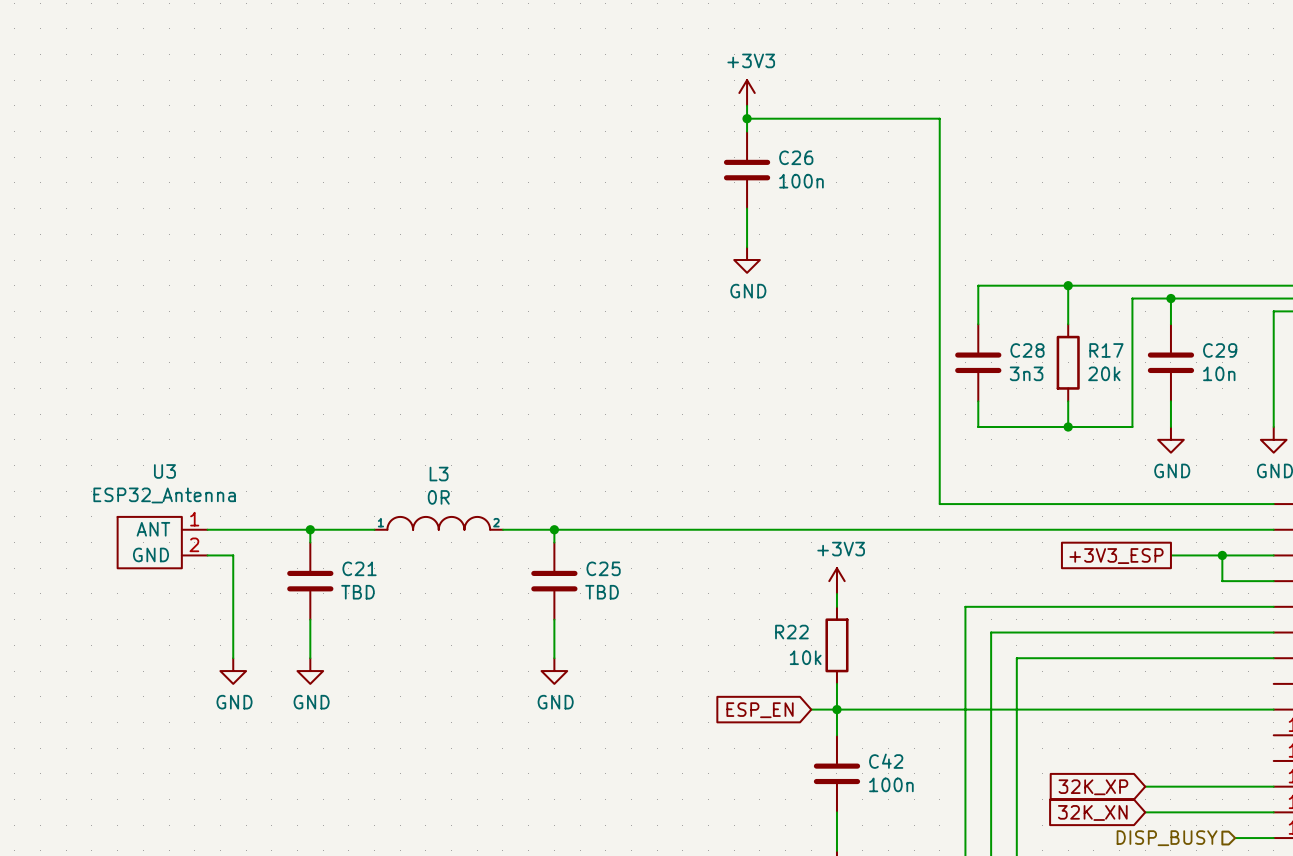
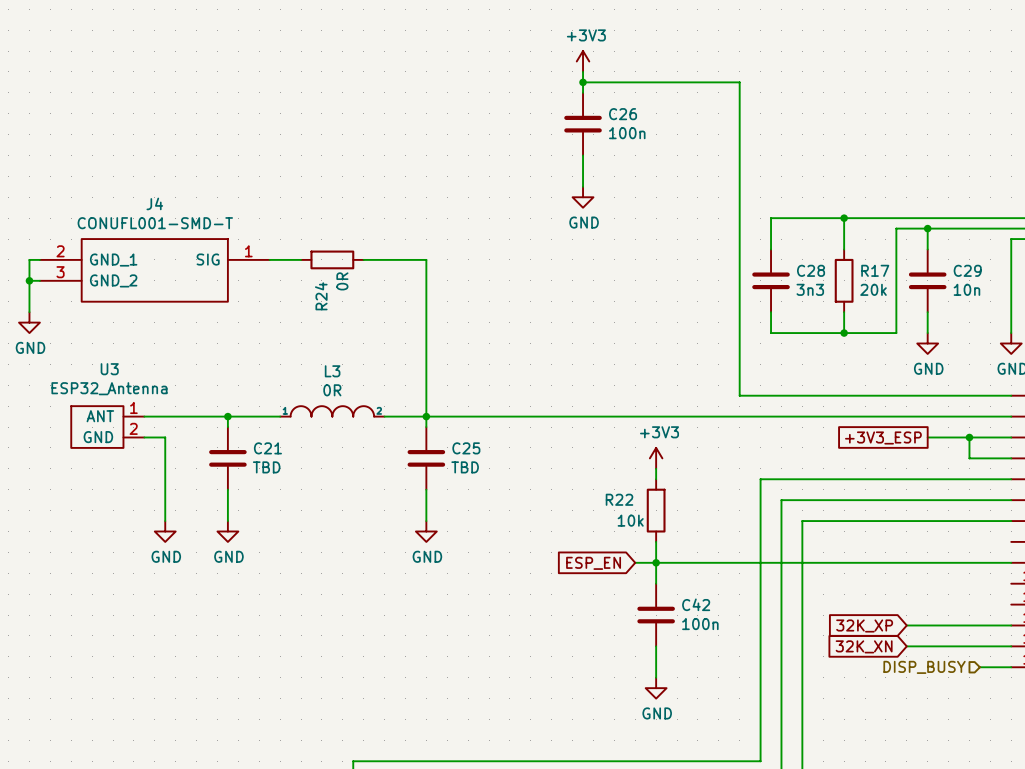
wire: none -> (39, 259) (29, 259) (29, 312)
wire: none -> (269, 259) (301, 259)
R24: none -> 0R (332, 259)
wire: none -> (363, 259) (426, 259) (426, 416)
J4: none -> CONUFL001-SMD-T (154, 270)
wire: none -> (29, 280) (39, 280)
junction: none -> (29, 280)
power symbol: none -> GND (29, 322)

